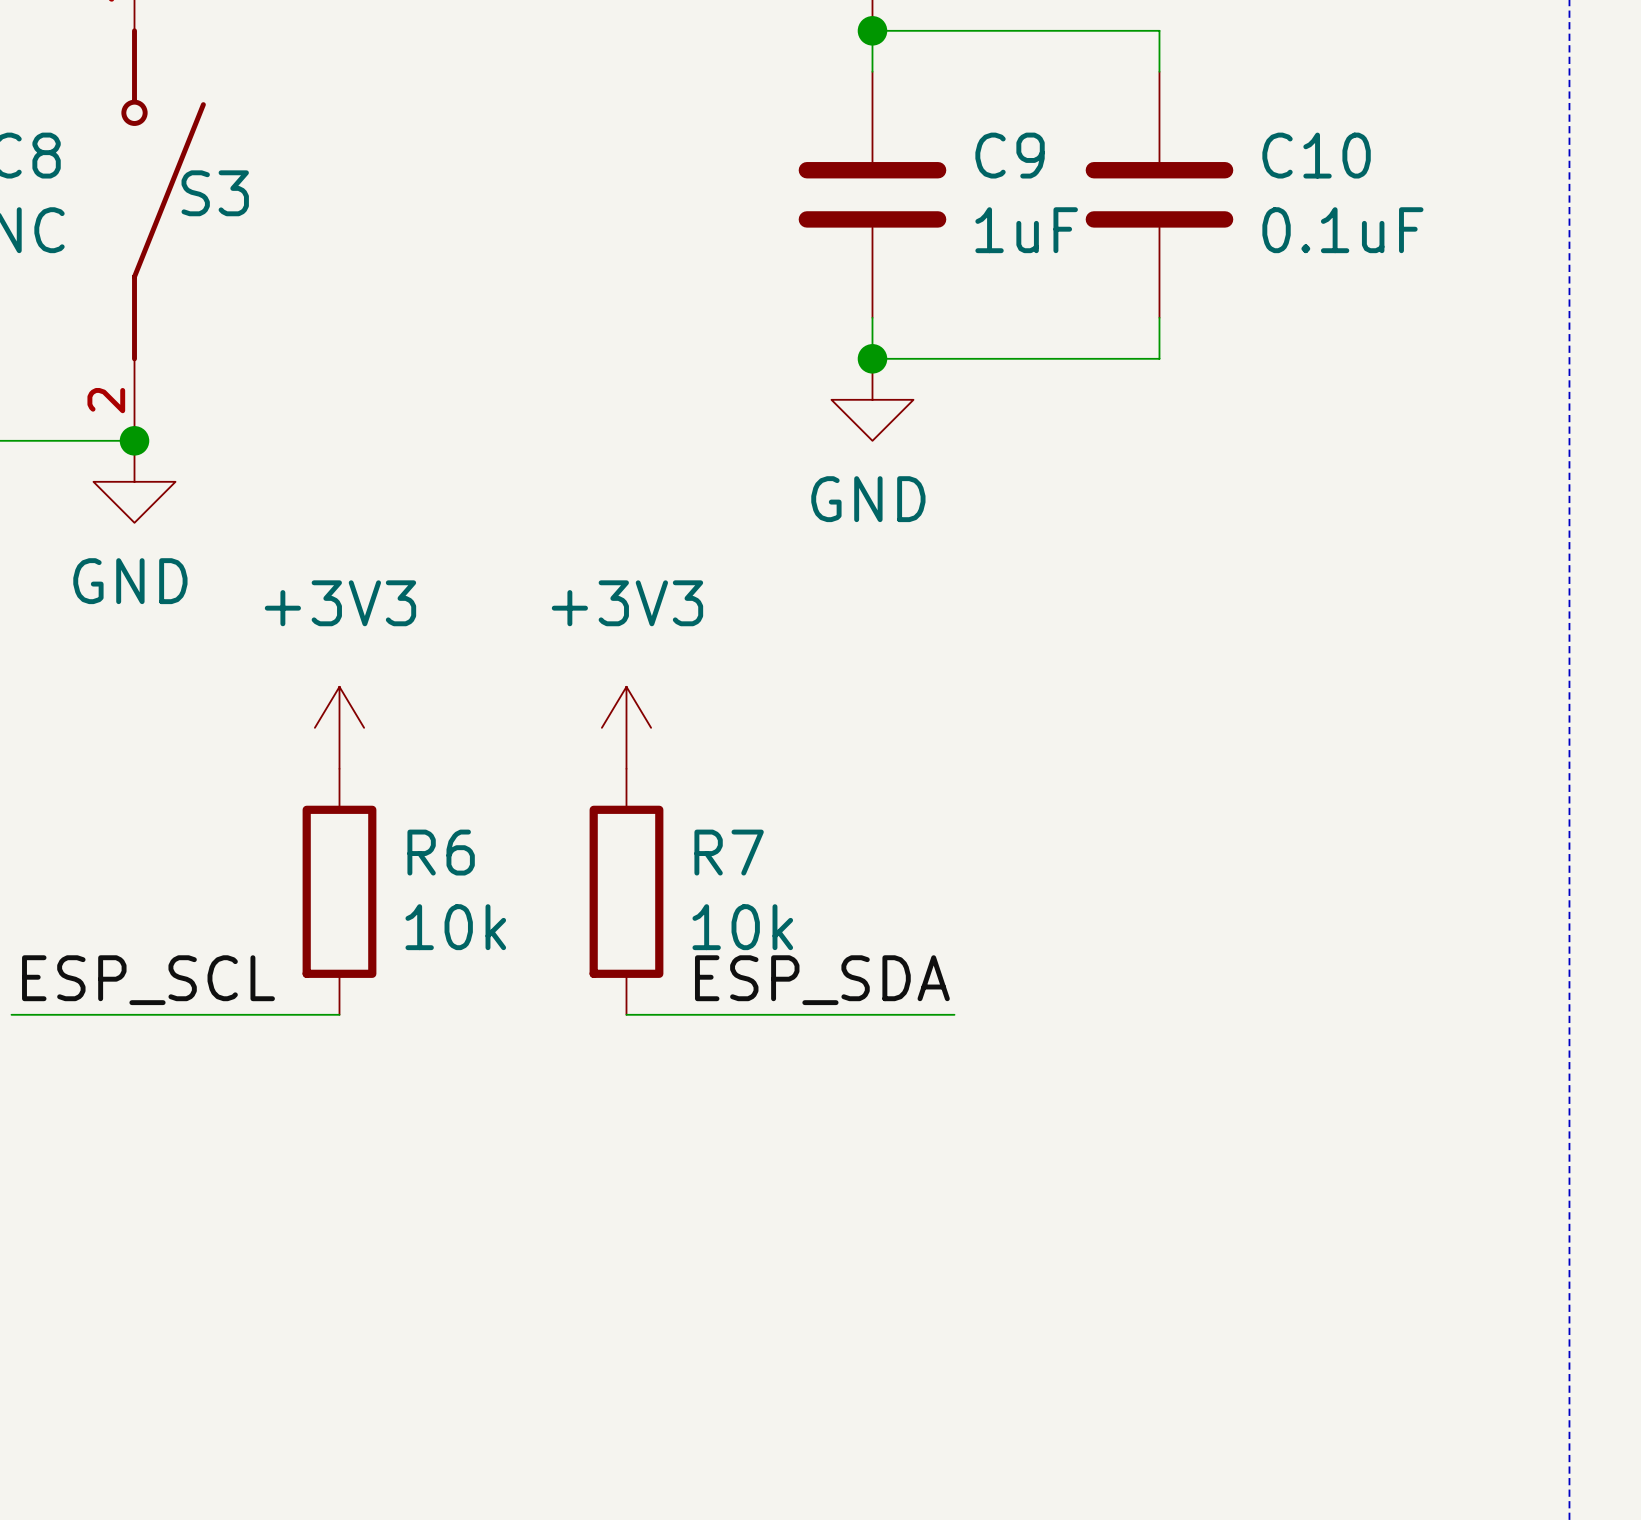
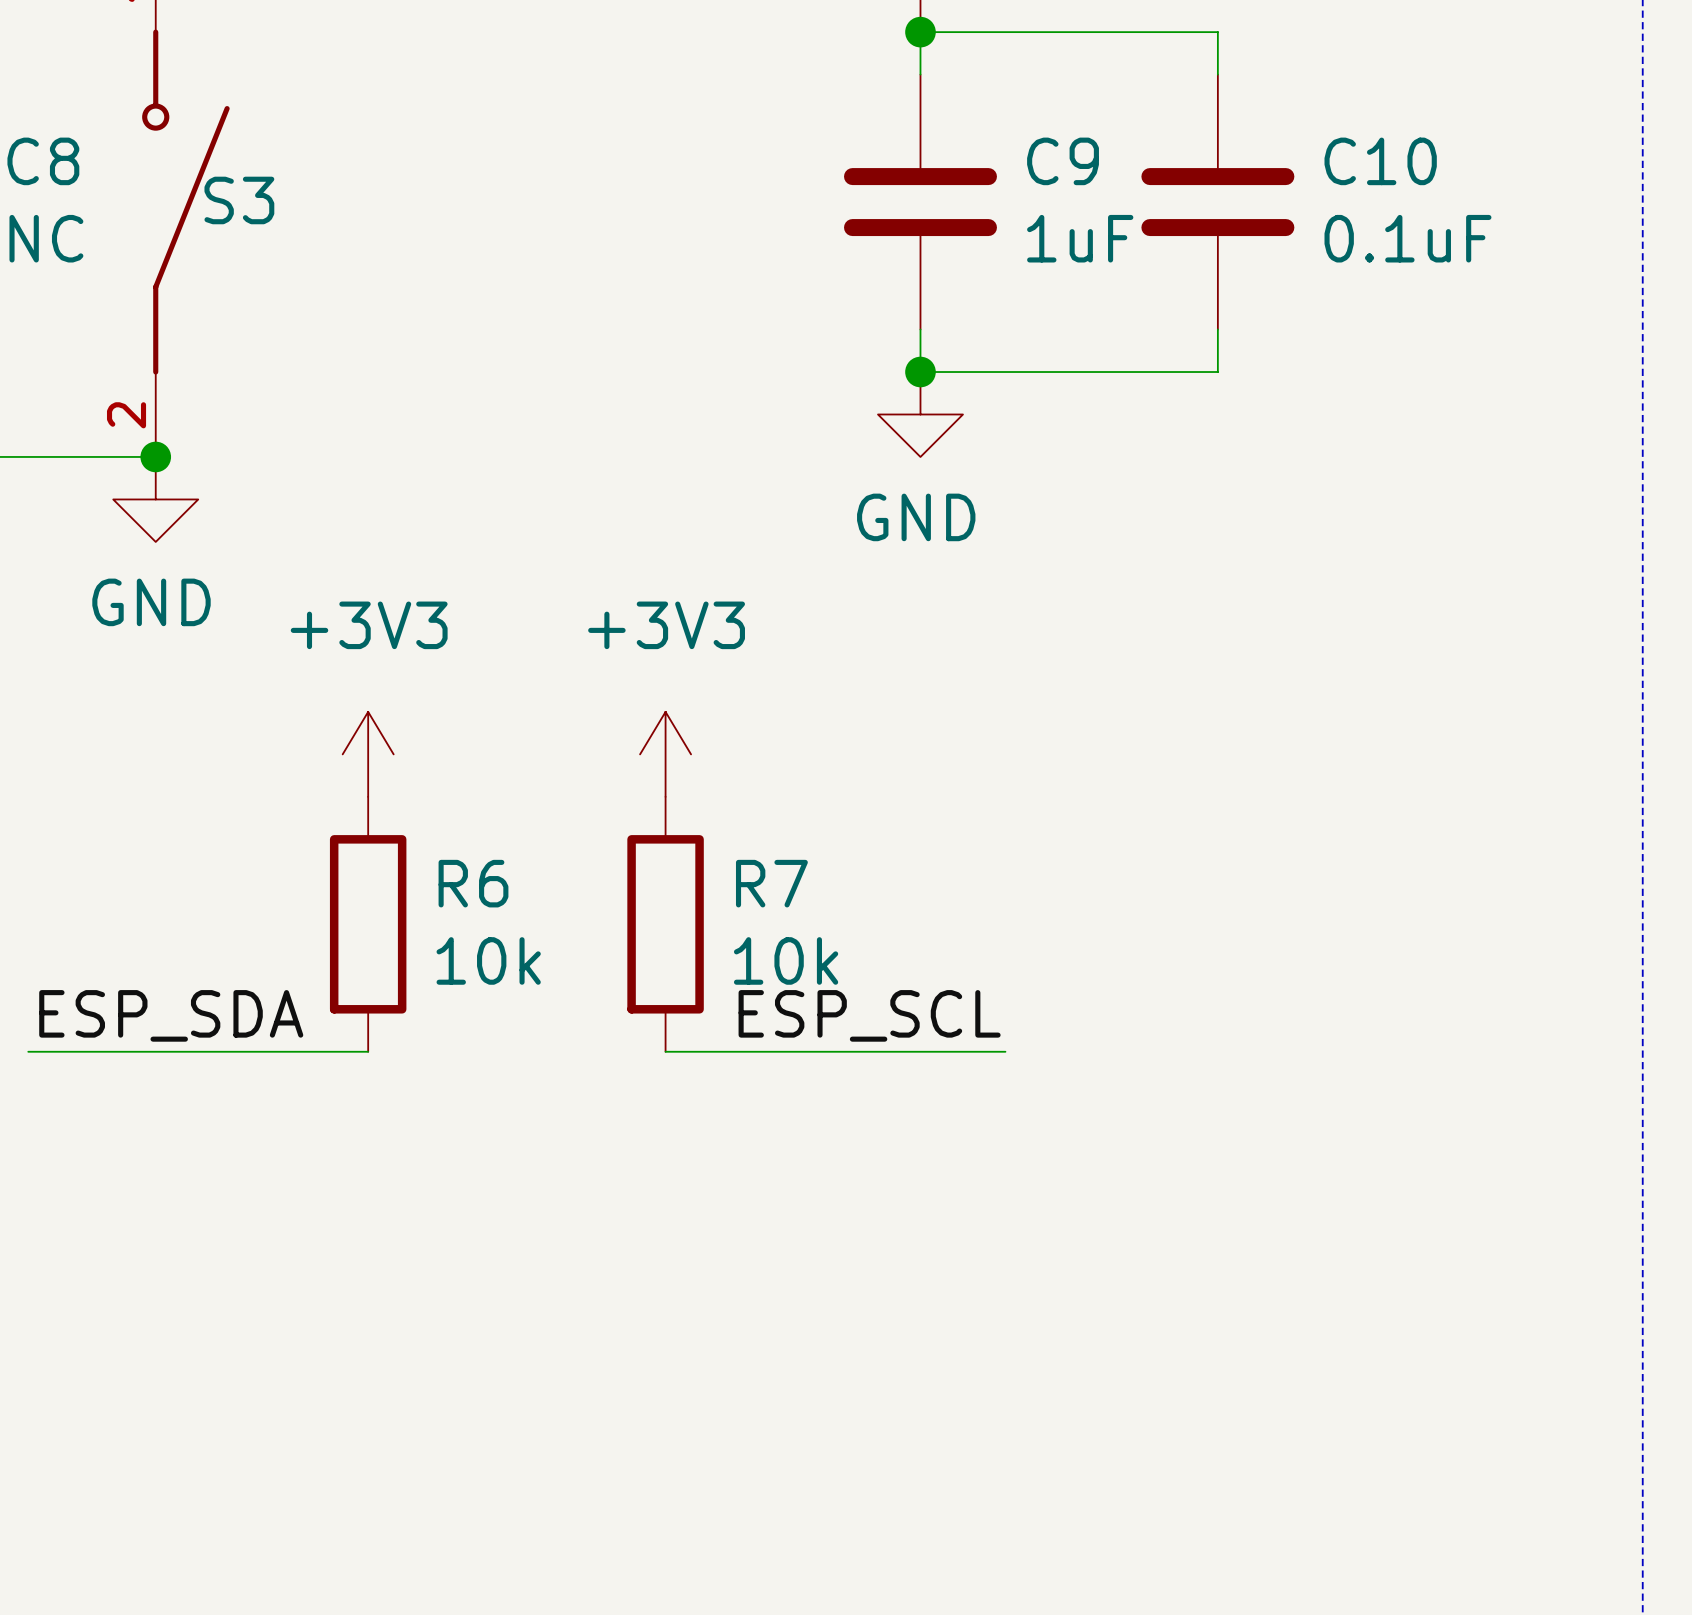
label: ESP_SCL (148, 980) -> ESP_SDA (171, 1015)
label: ESP_SDA (822, 980) -> ESP_SCL (869, 1015)

